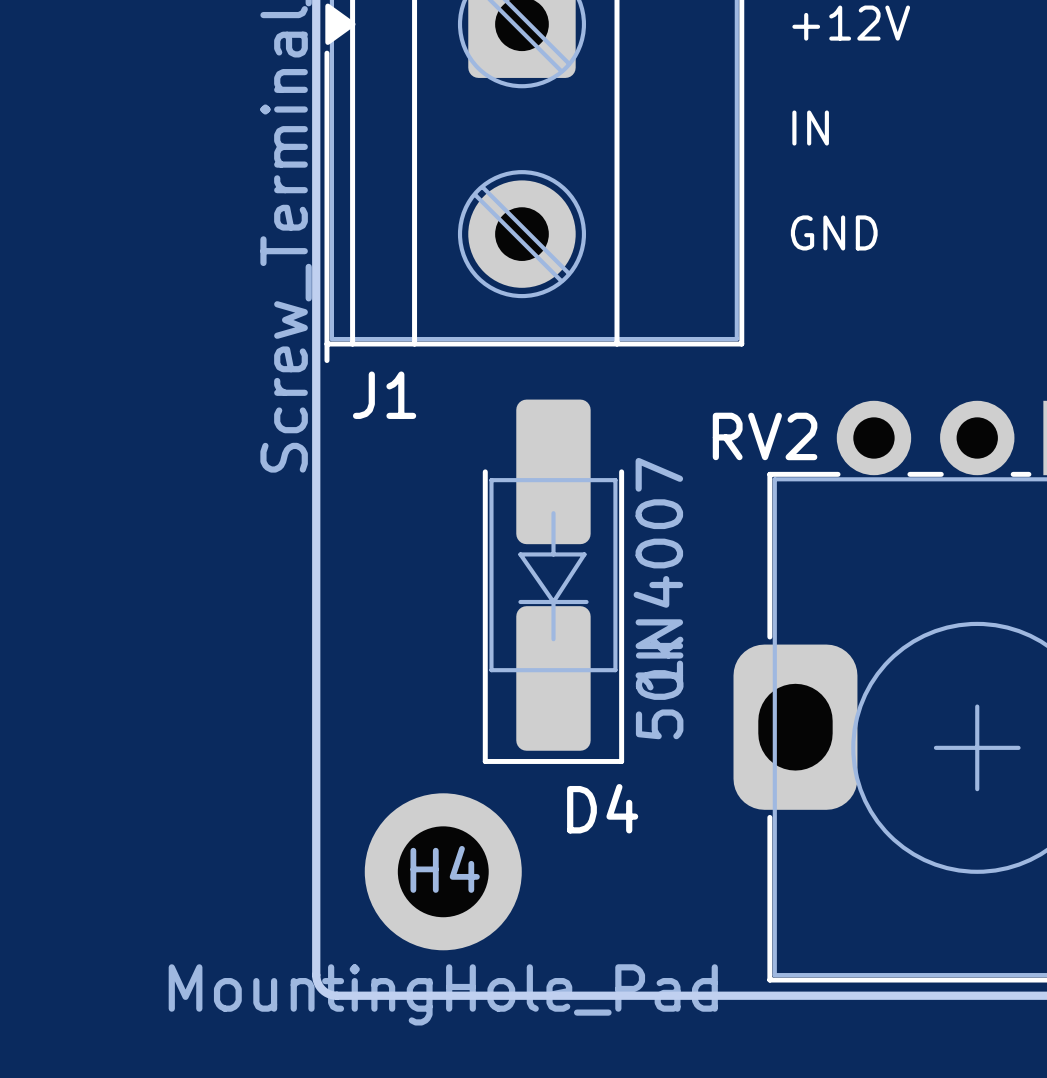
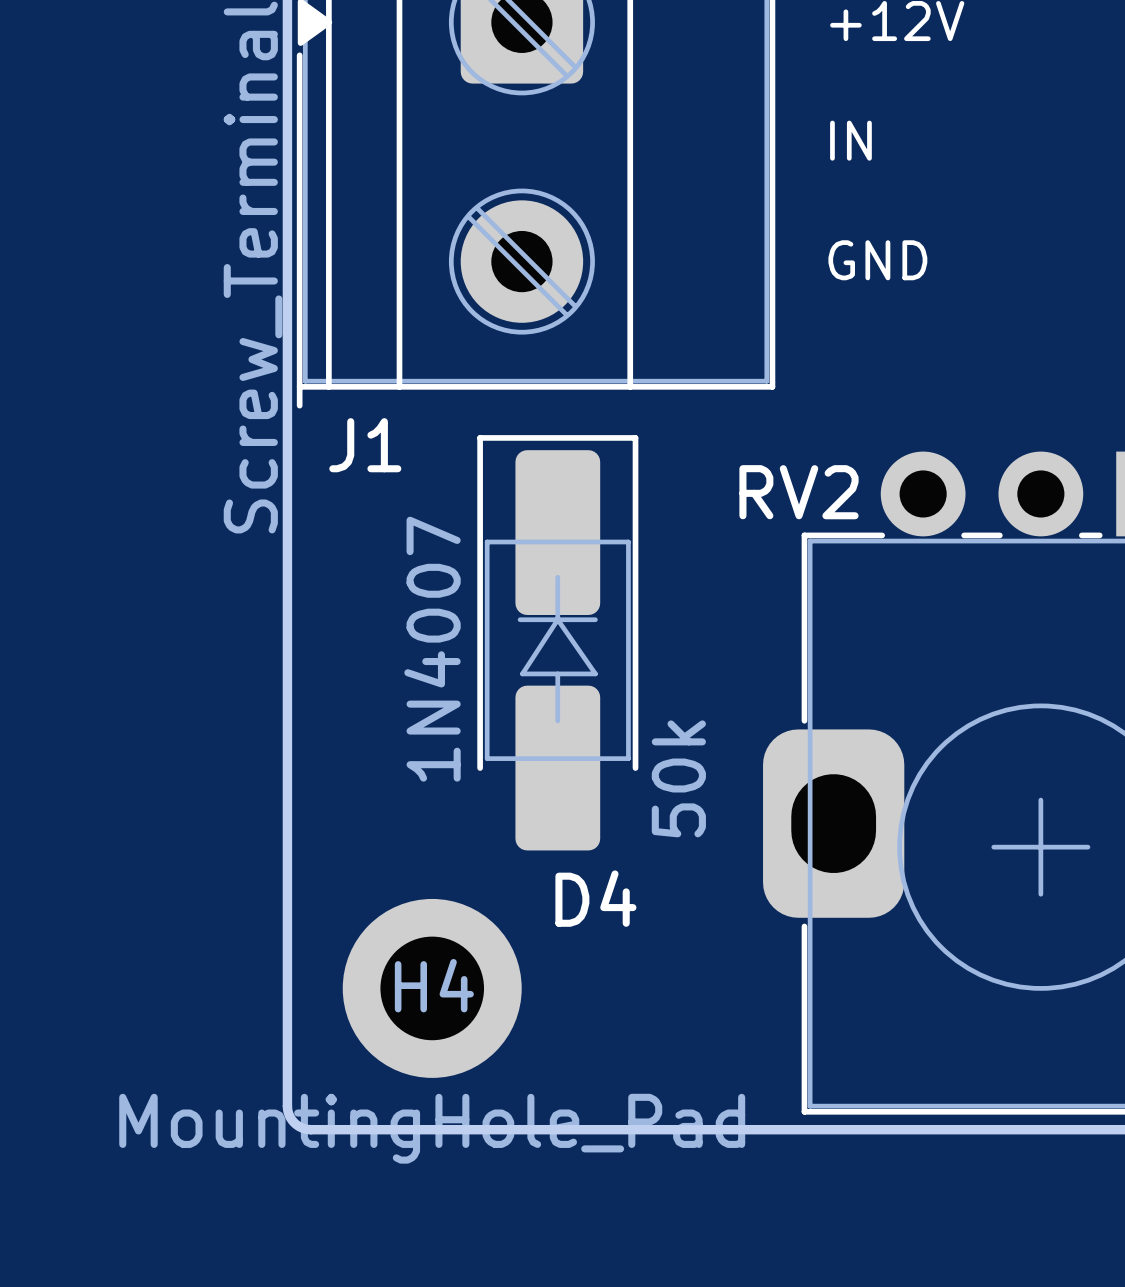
D4 rotation: 0° (553, 581) -> 180° (557, 642)

